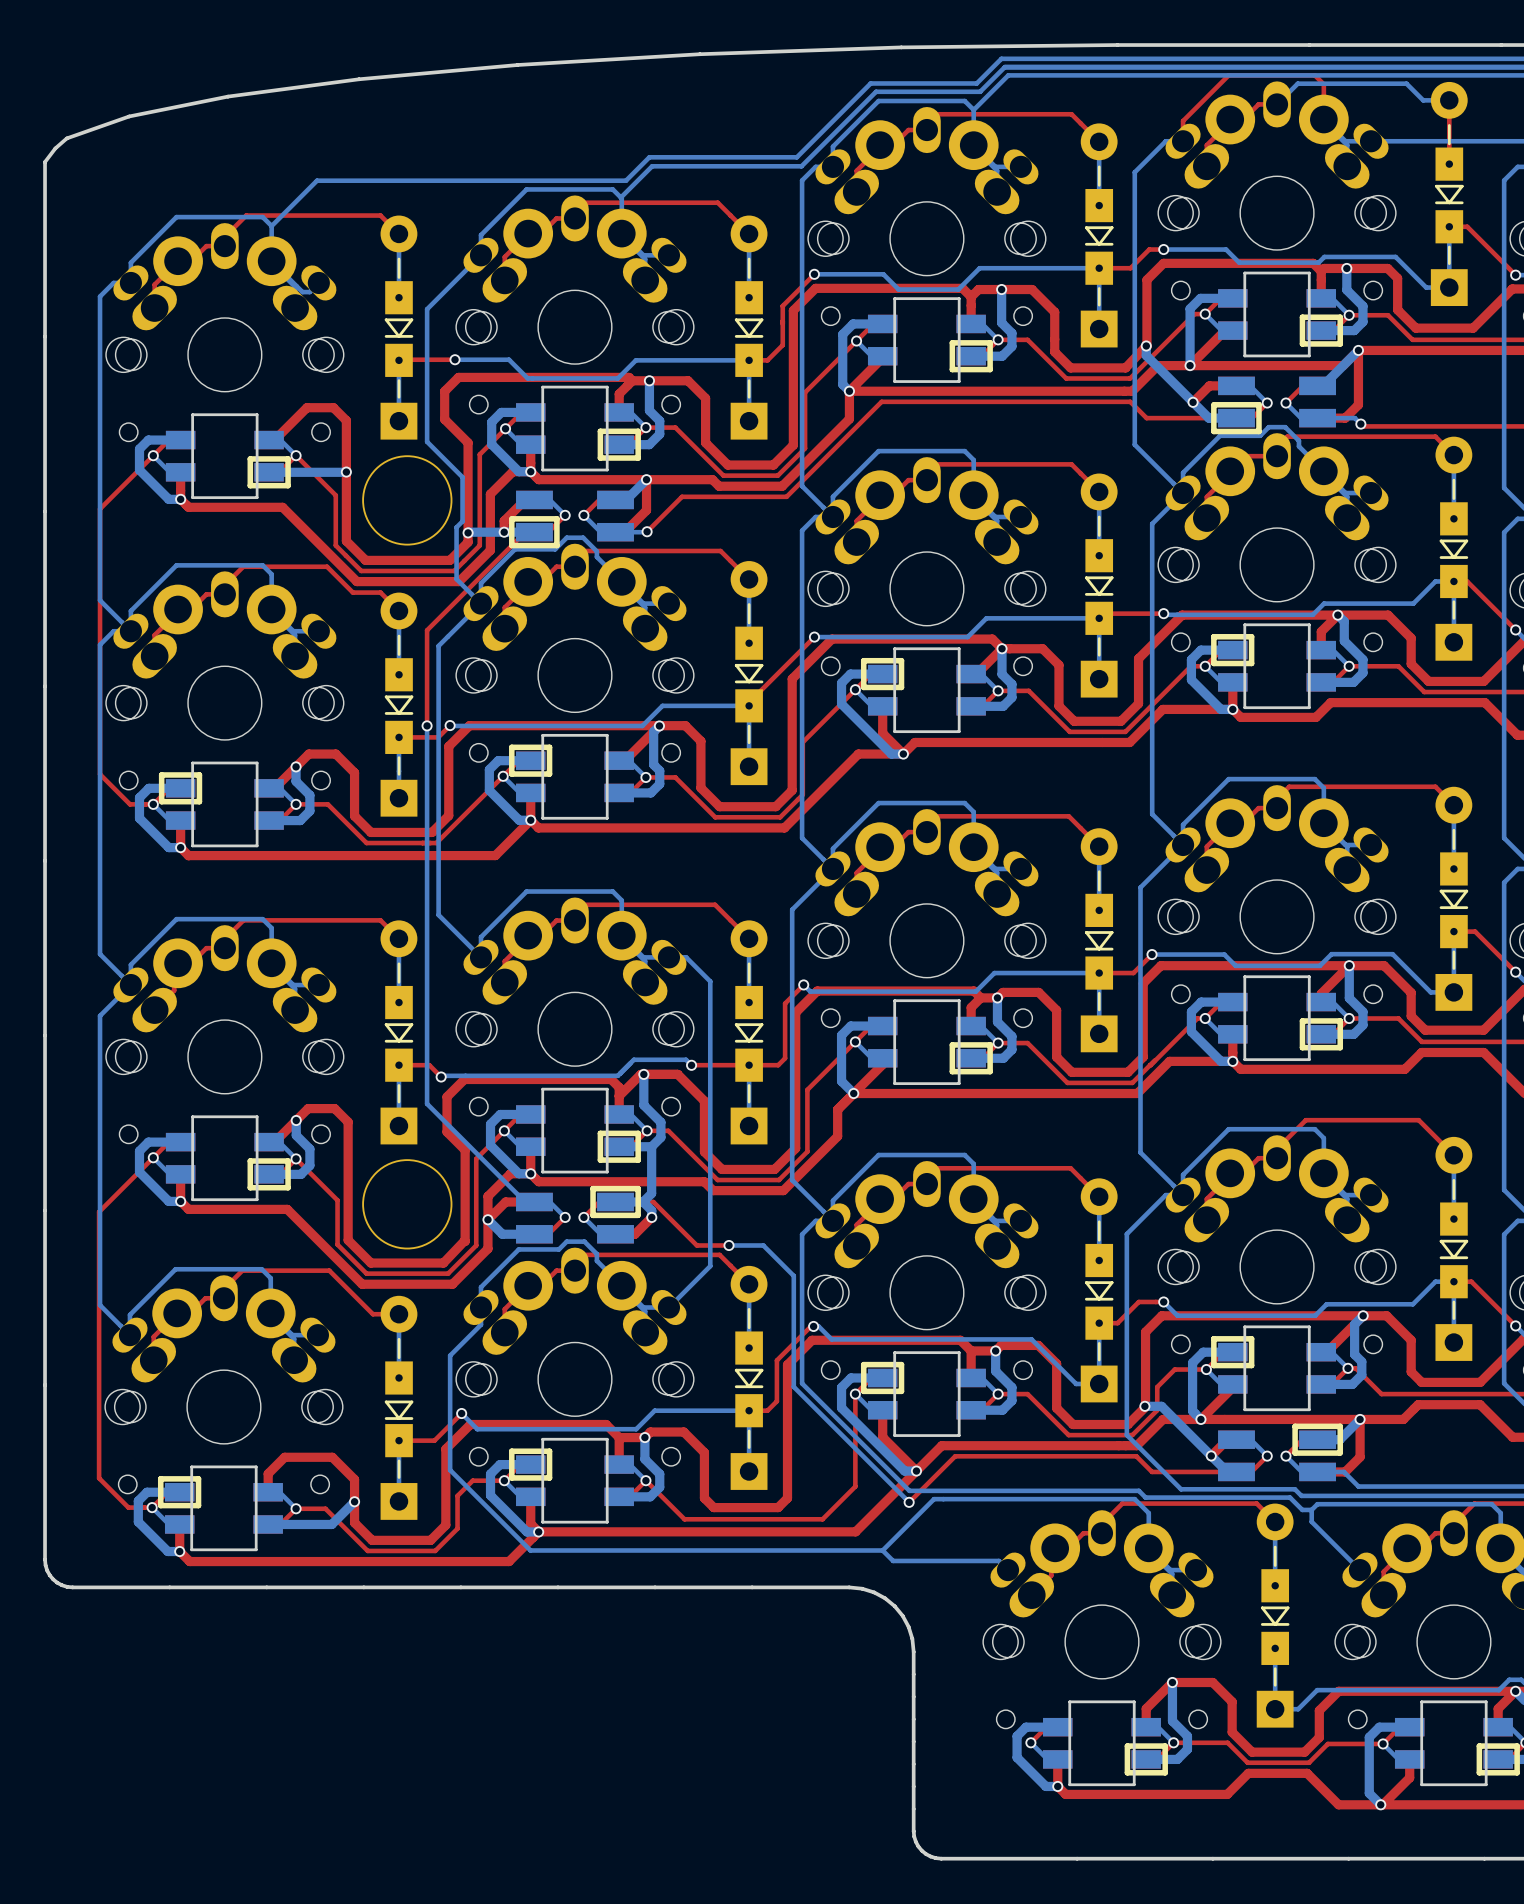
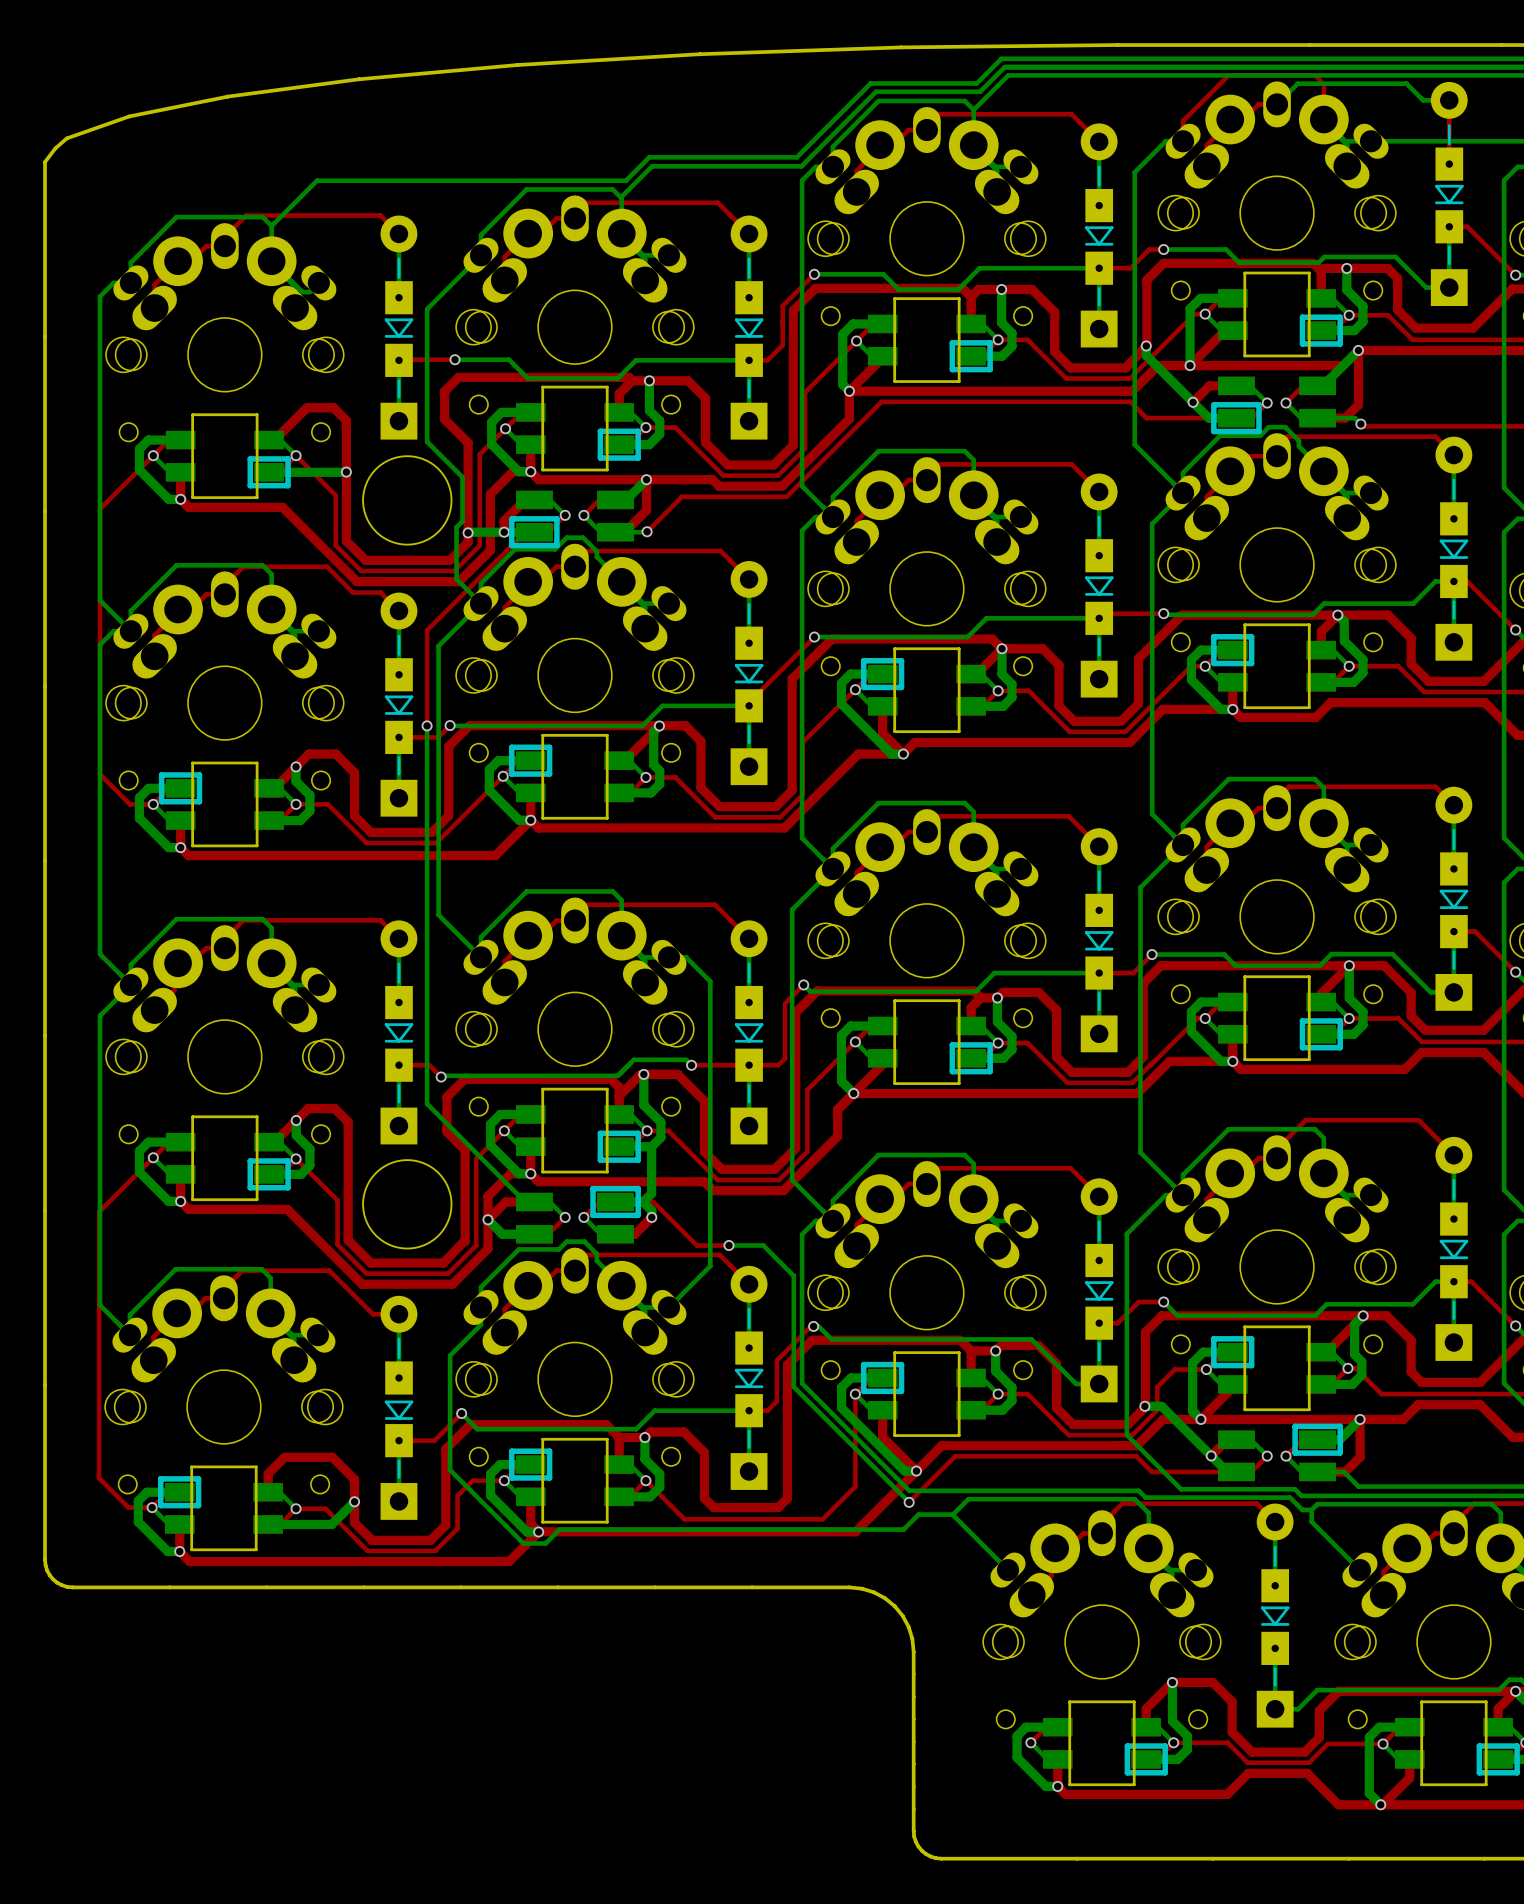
bottom track: (968, 1499) (934, 1499) (918, 1514) -> (968, 1499) (952, 1514)
bottom track: (903, 1529) (882, 1550) -> none
bottom track: (523, 1543) (530, 1550) (882, 1550) -> (523, 1543) (545, 1543) (559, 1529) (903, 1529)
bottom track: (882, 1550) (893, 1560) (998, 1560) -> (918, 1514) (952, 1514) (998, 1560)

